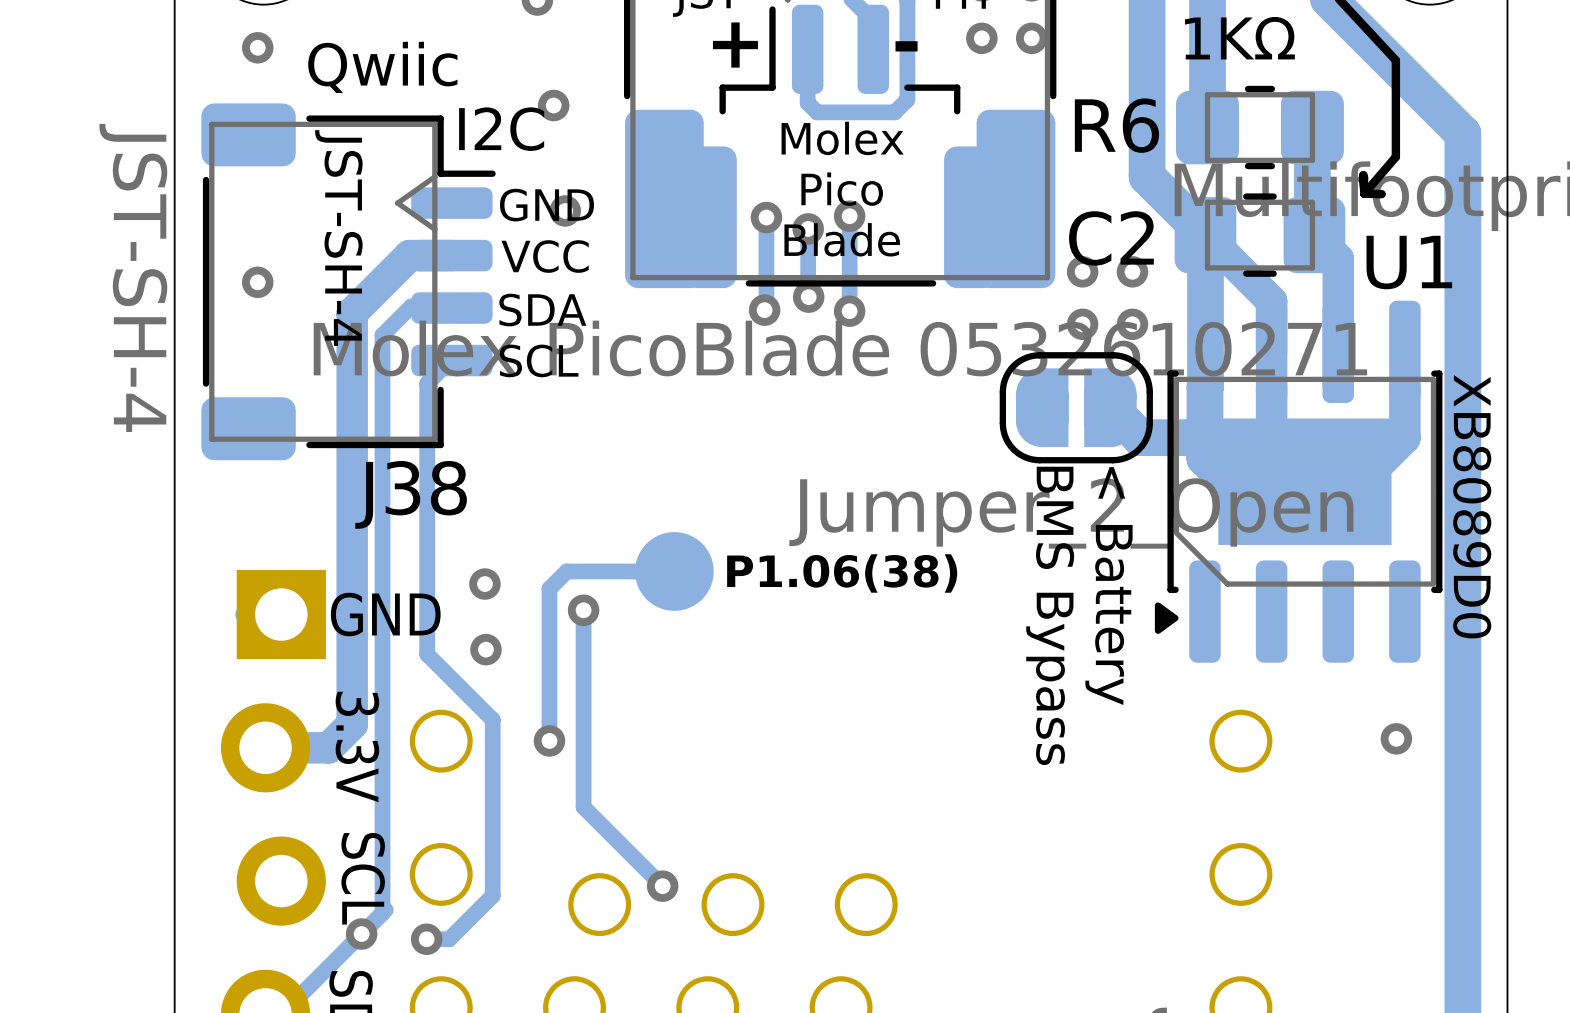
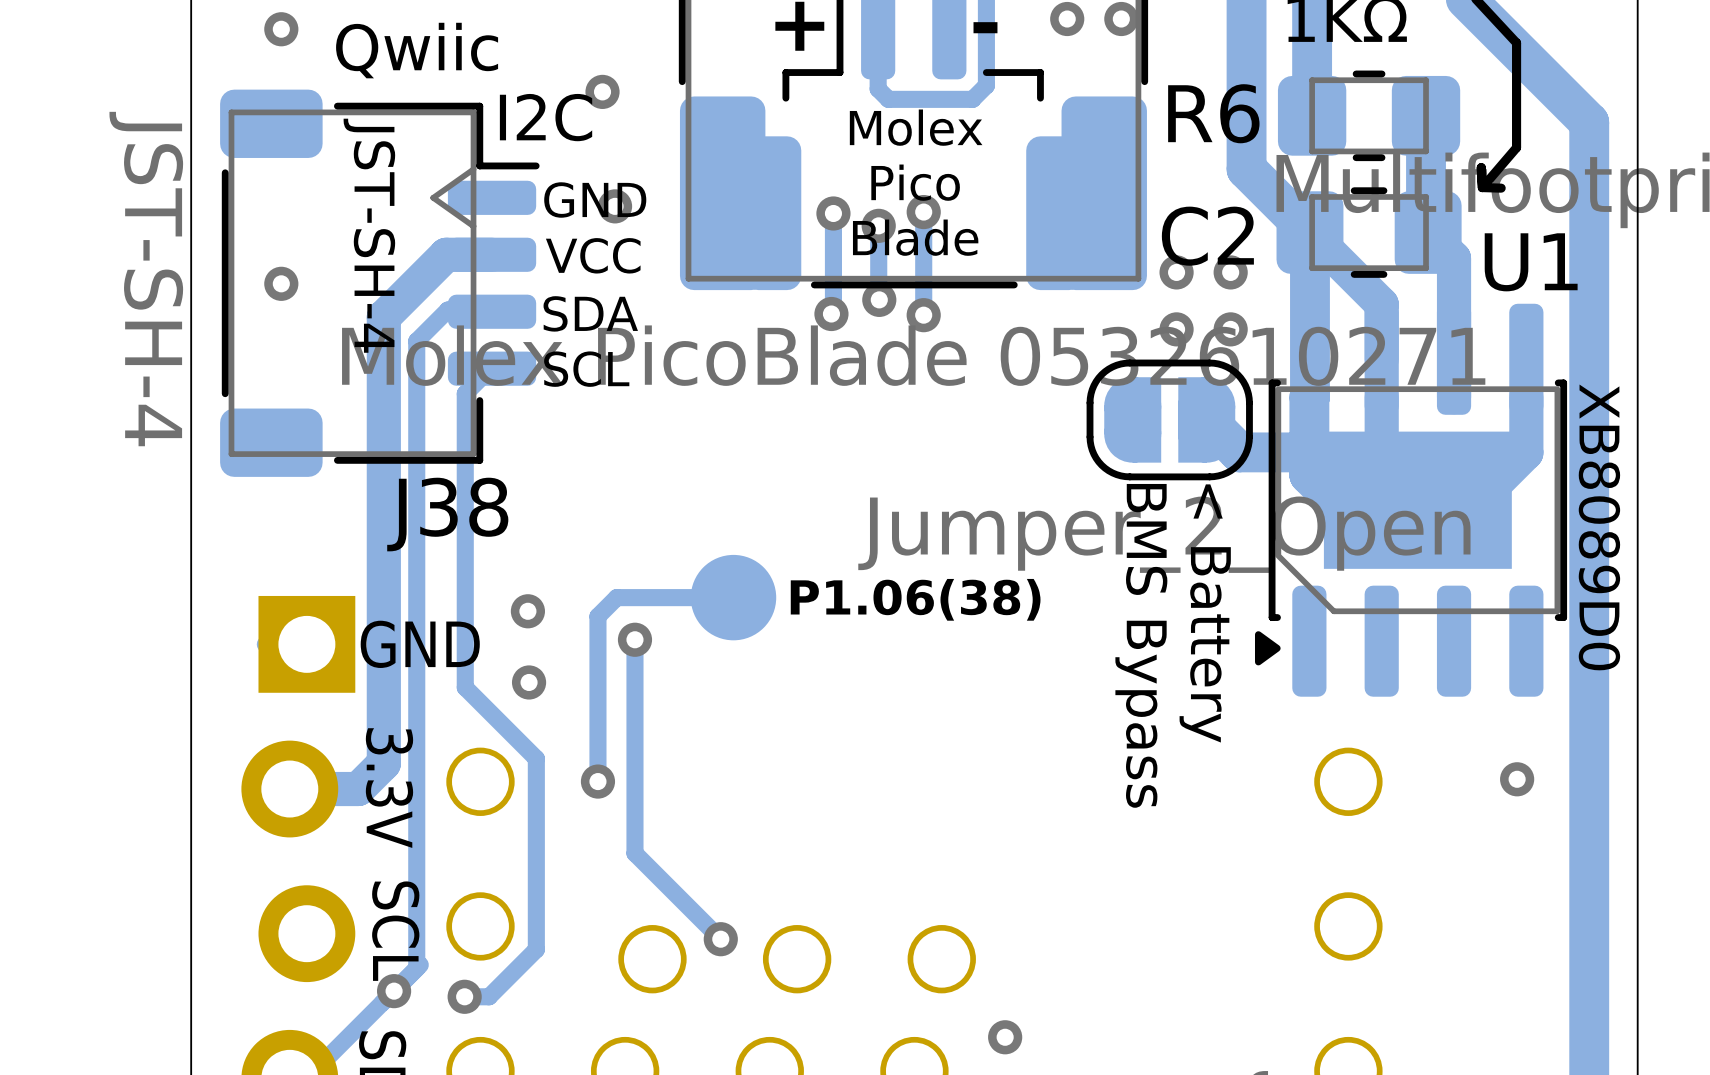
via: none -> (1005, 1037)

